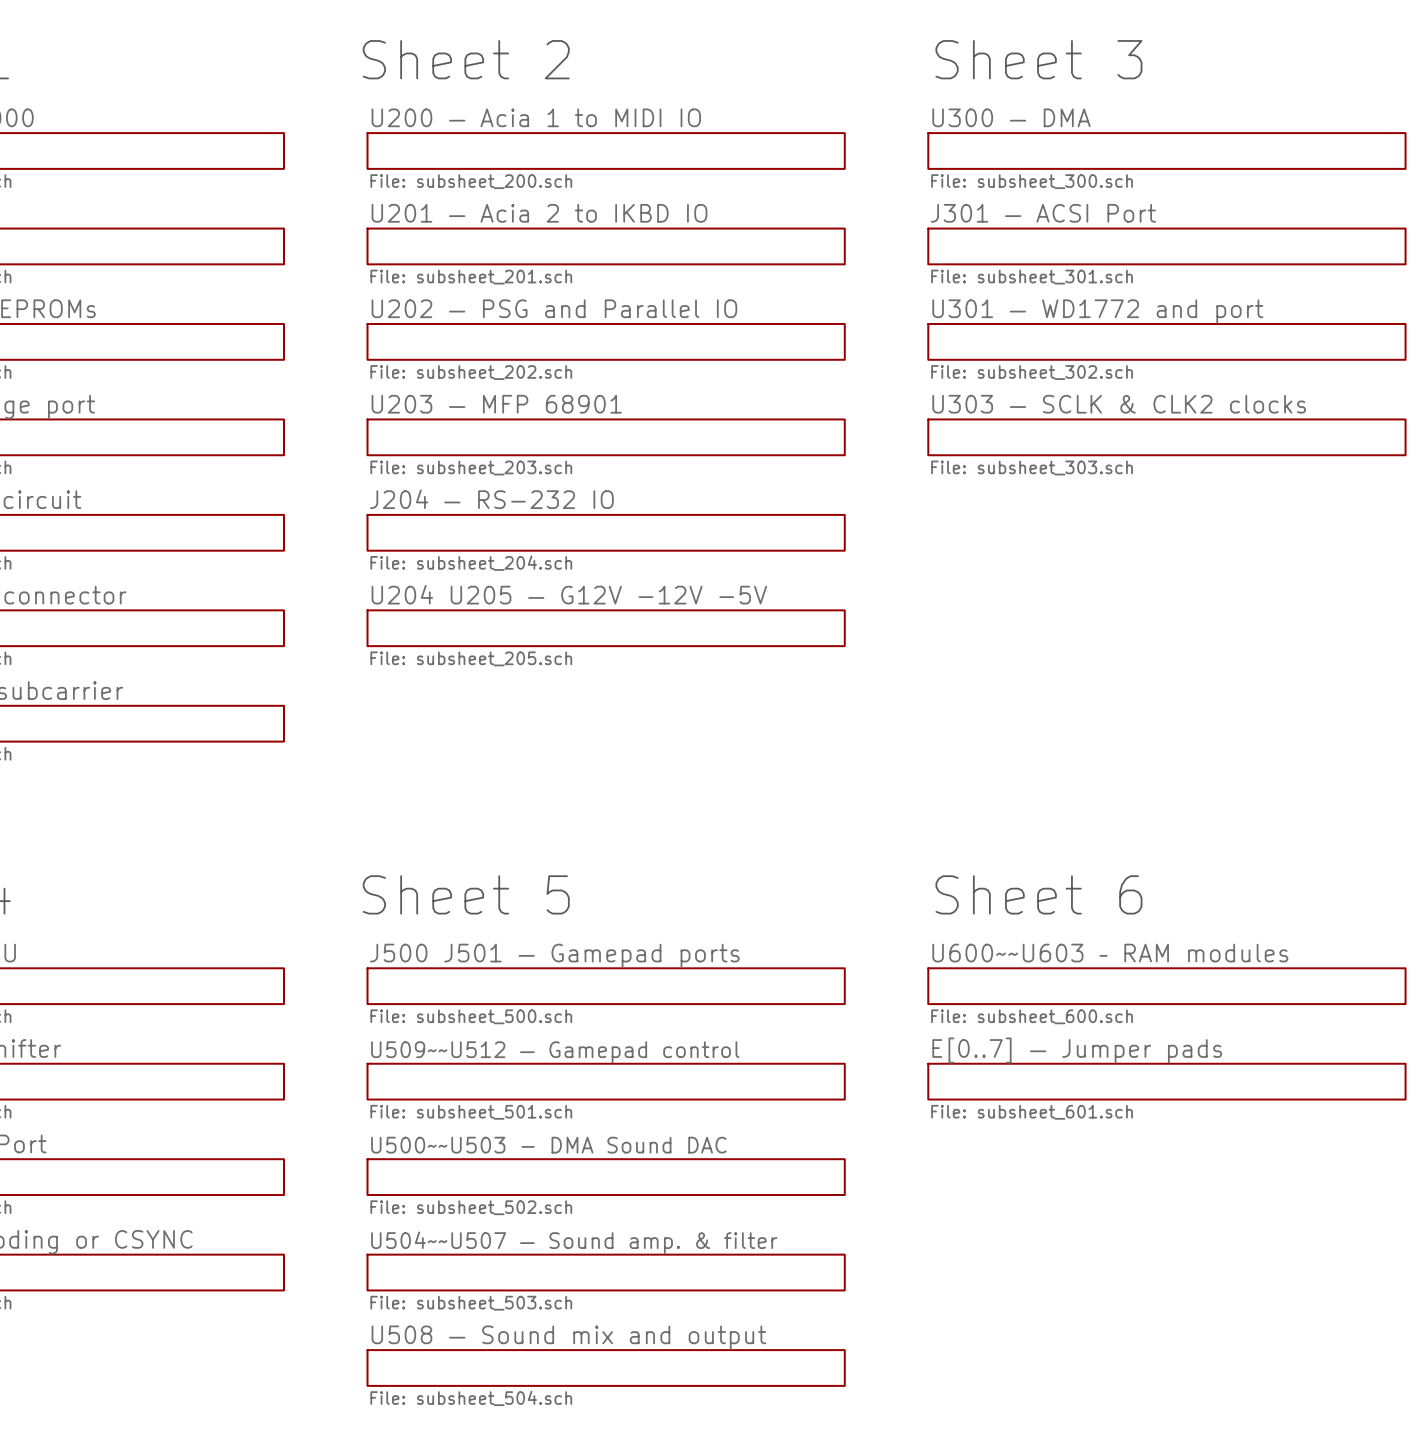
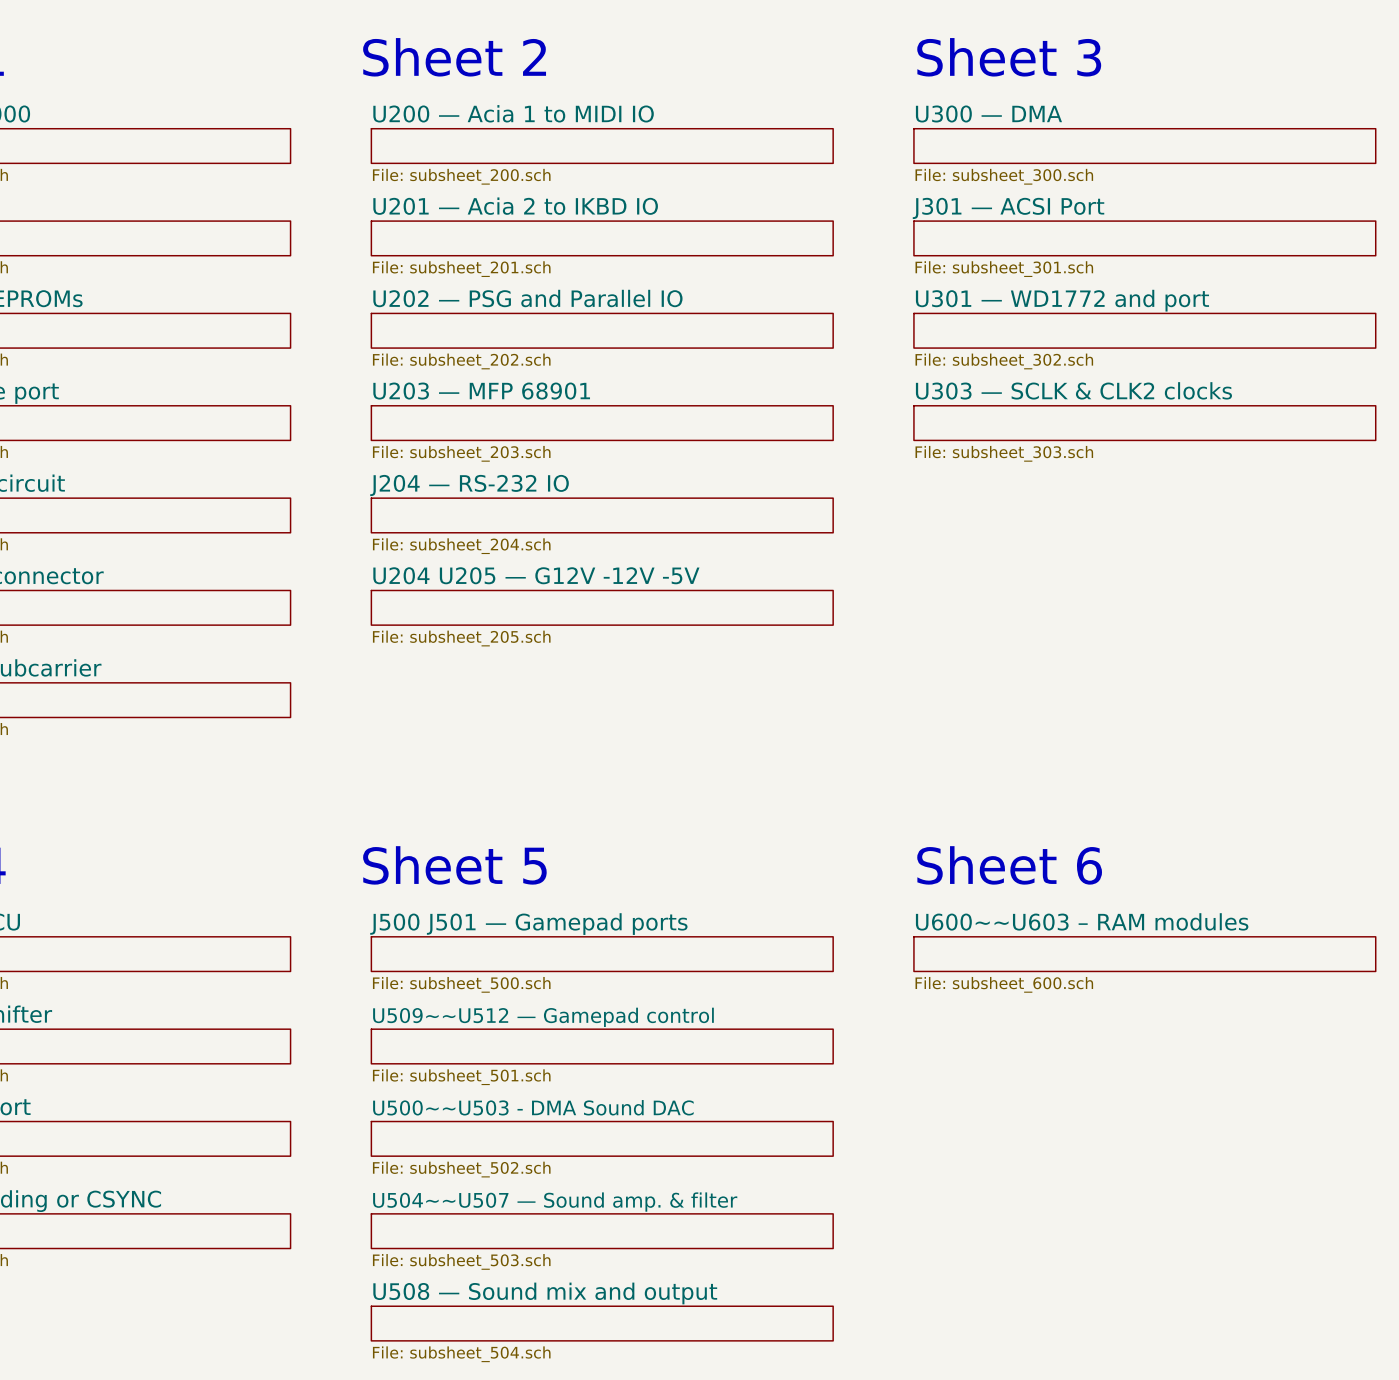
sheet E[0..7] — Jumper pads: File: subsheet_601.sch (1166, 1081) -> none

